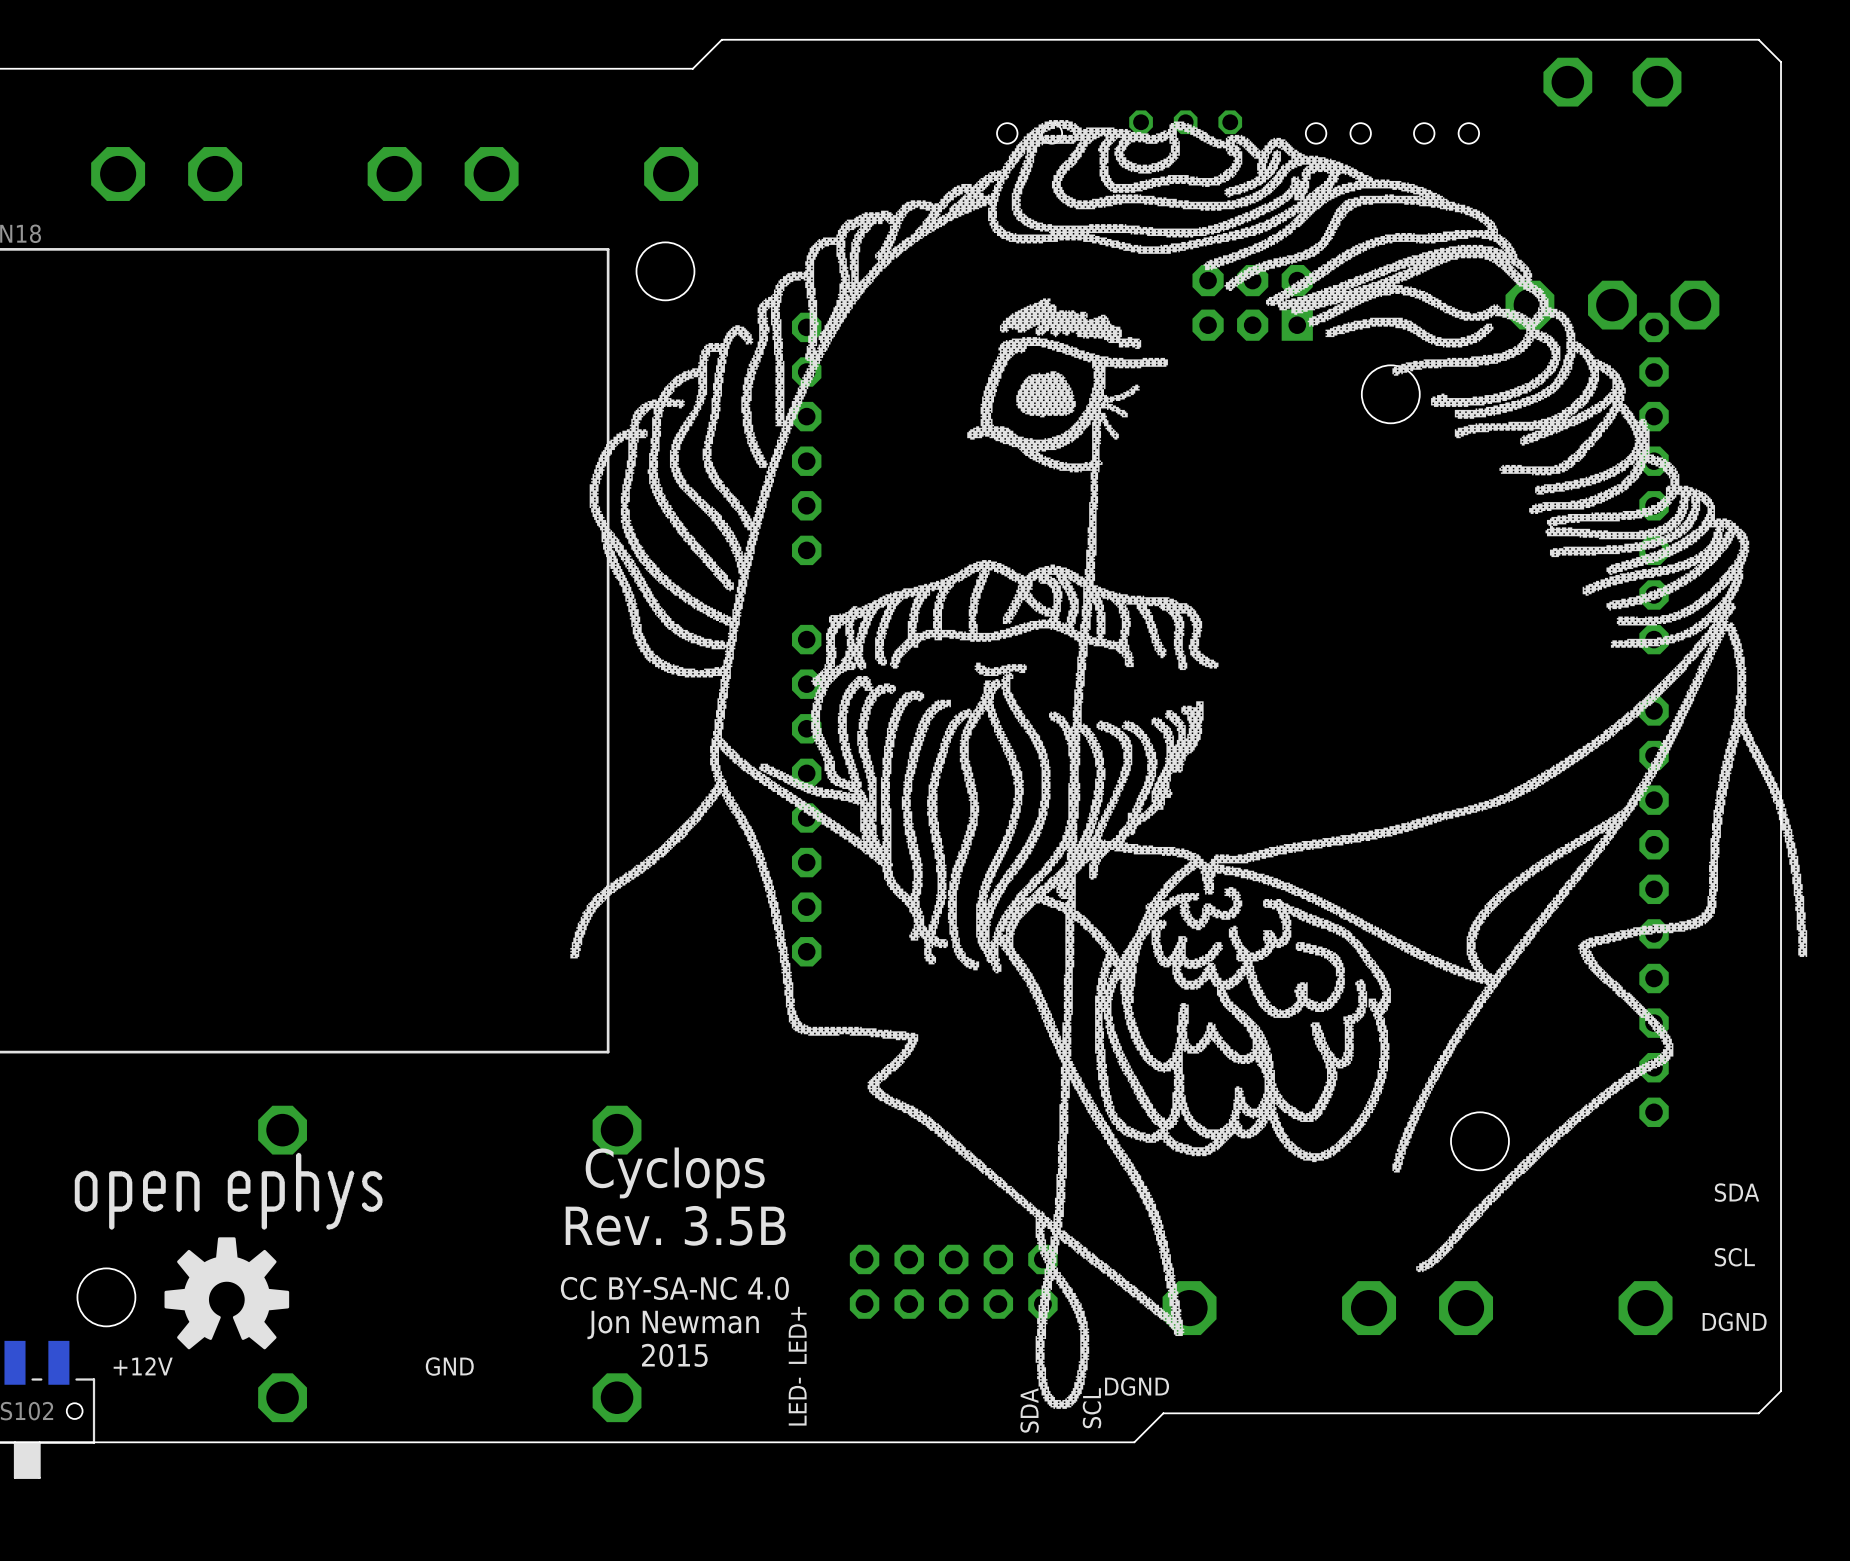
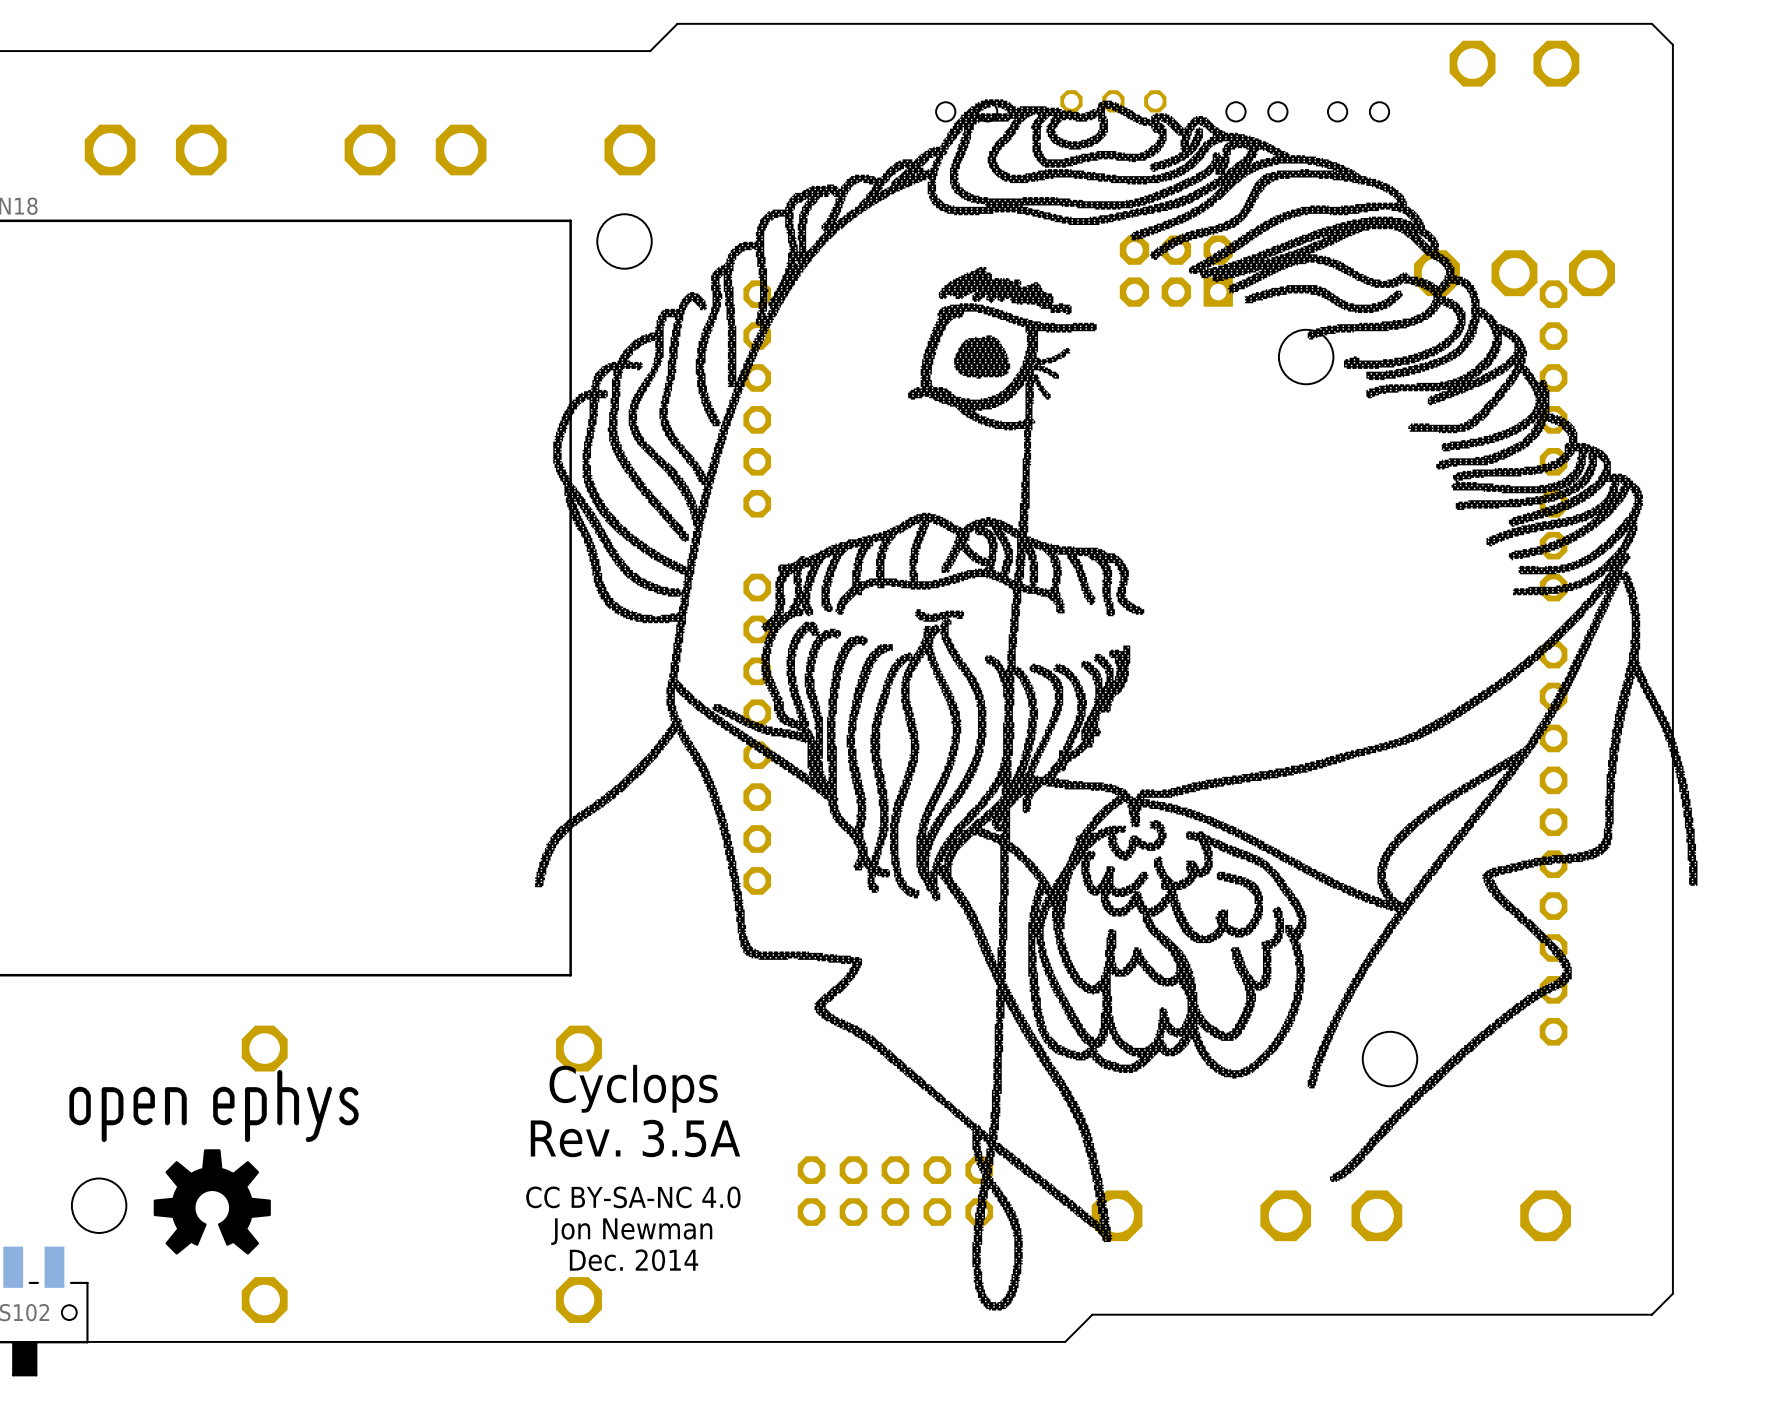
text: SDA (1737, 1192) -> none
text: Rev. 3.5B (675, 1225) -> Rev. 3.5A (635, 1138)
text: SCL (1734, 1257) -> none
text: DGND (1734, 1321) -> none
text: LED+ (797, 1335) -> none
text: 2015 (674, 1355) -> Dec. 2014 (634, 1260)
text: +12V (143, 1366) -> none
text: GND (449, 1366) -> none
text: DGND (1137, 1386) -> none
text: LED- (797, 1401) -> none
text: SCL (1092, 1408) -> none
text: SDA (1029, 1410) -> none

